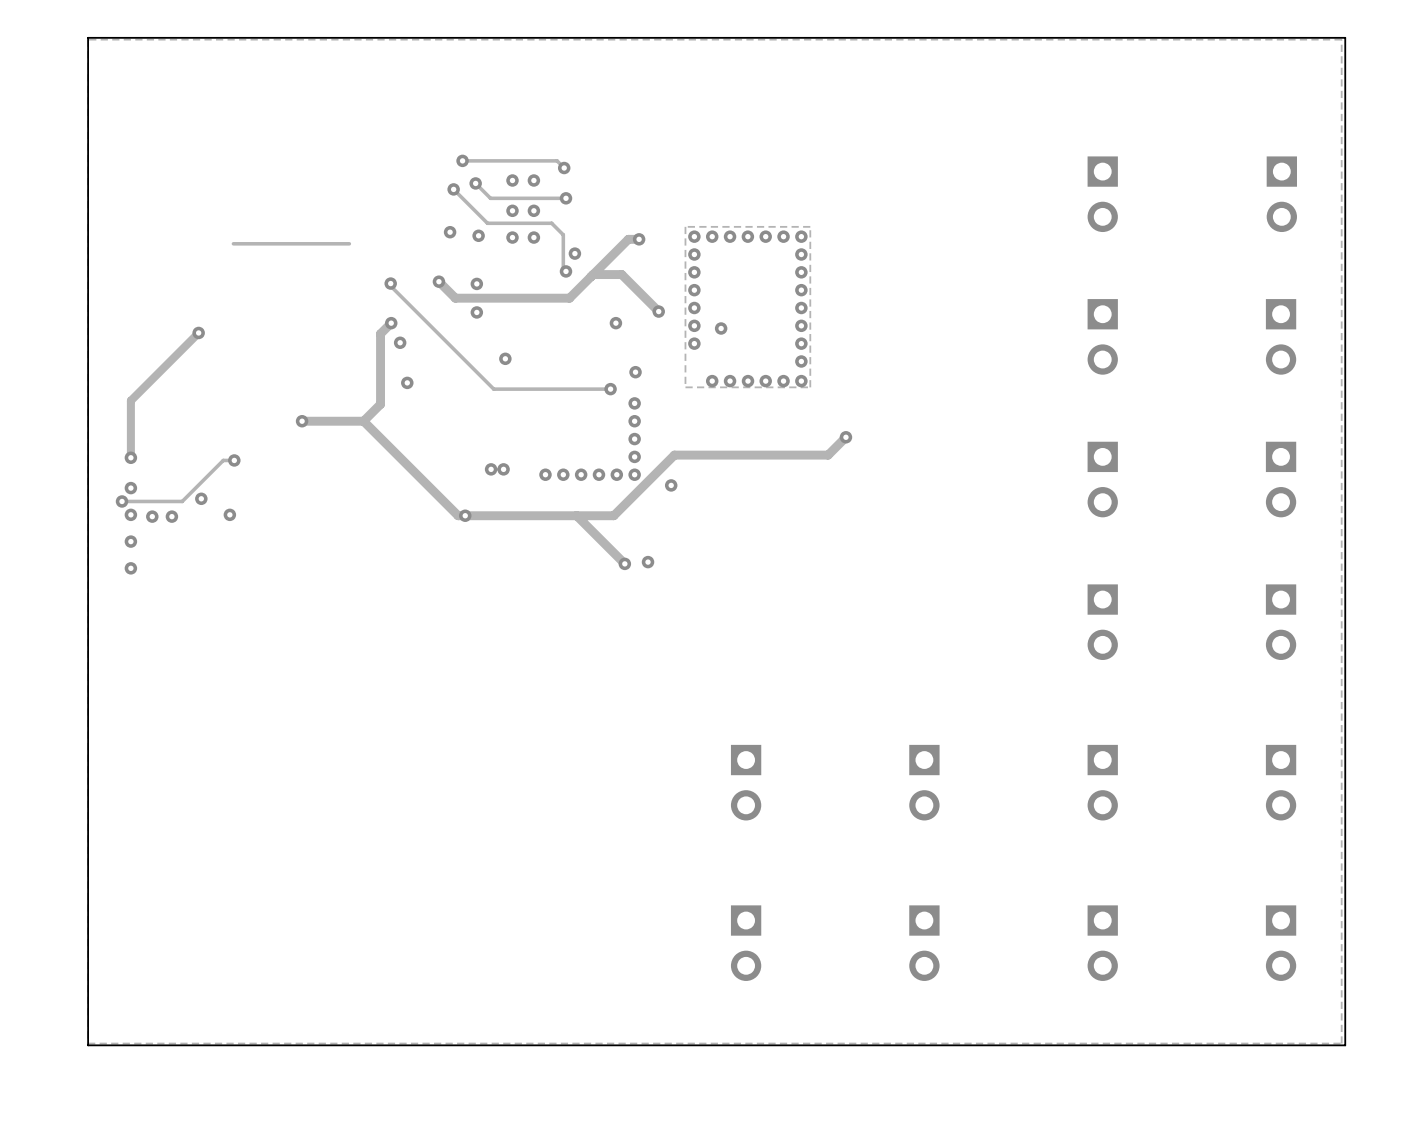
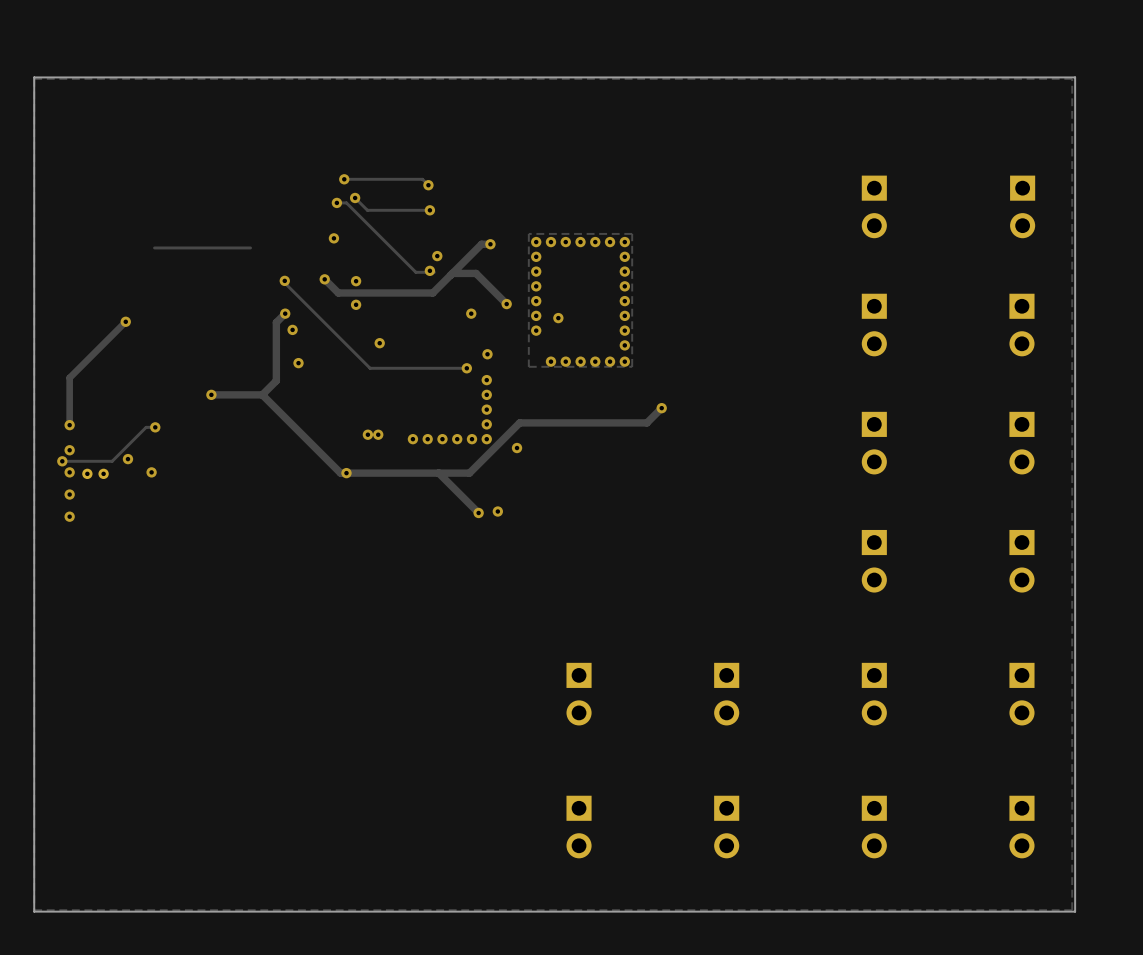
via: (512, 180) -> none
via: (533, 180) -> none
track: (453, 189) (487, 223) (551, 223) (563, 234) (563, 268) (565, 271) -> (336, 202) (346, 202) (415, 272) (434, 272)
via: (512, 210) -> none
via: (533, 210) -> none
via: (478, 235) -> none
via: (512, 237) -> none
via: (533, 237) -> none

